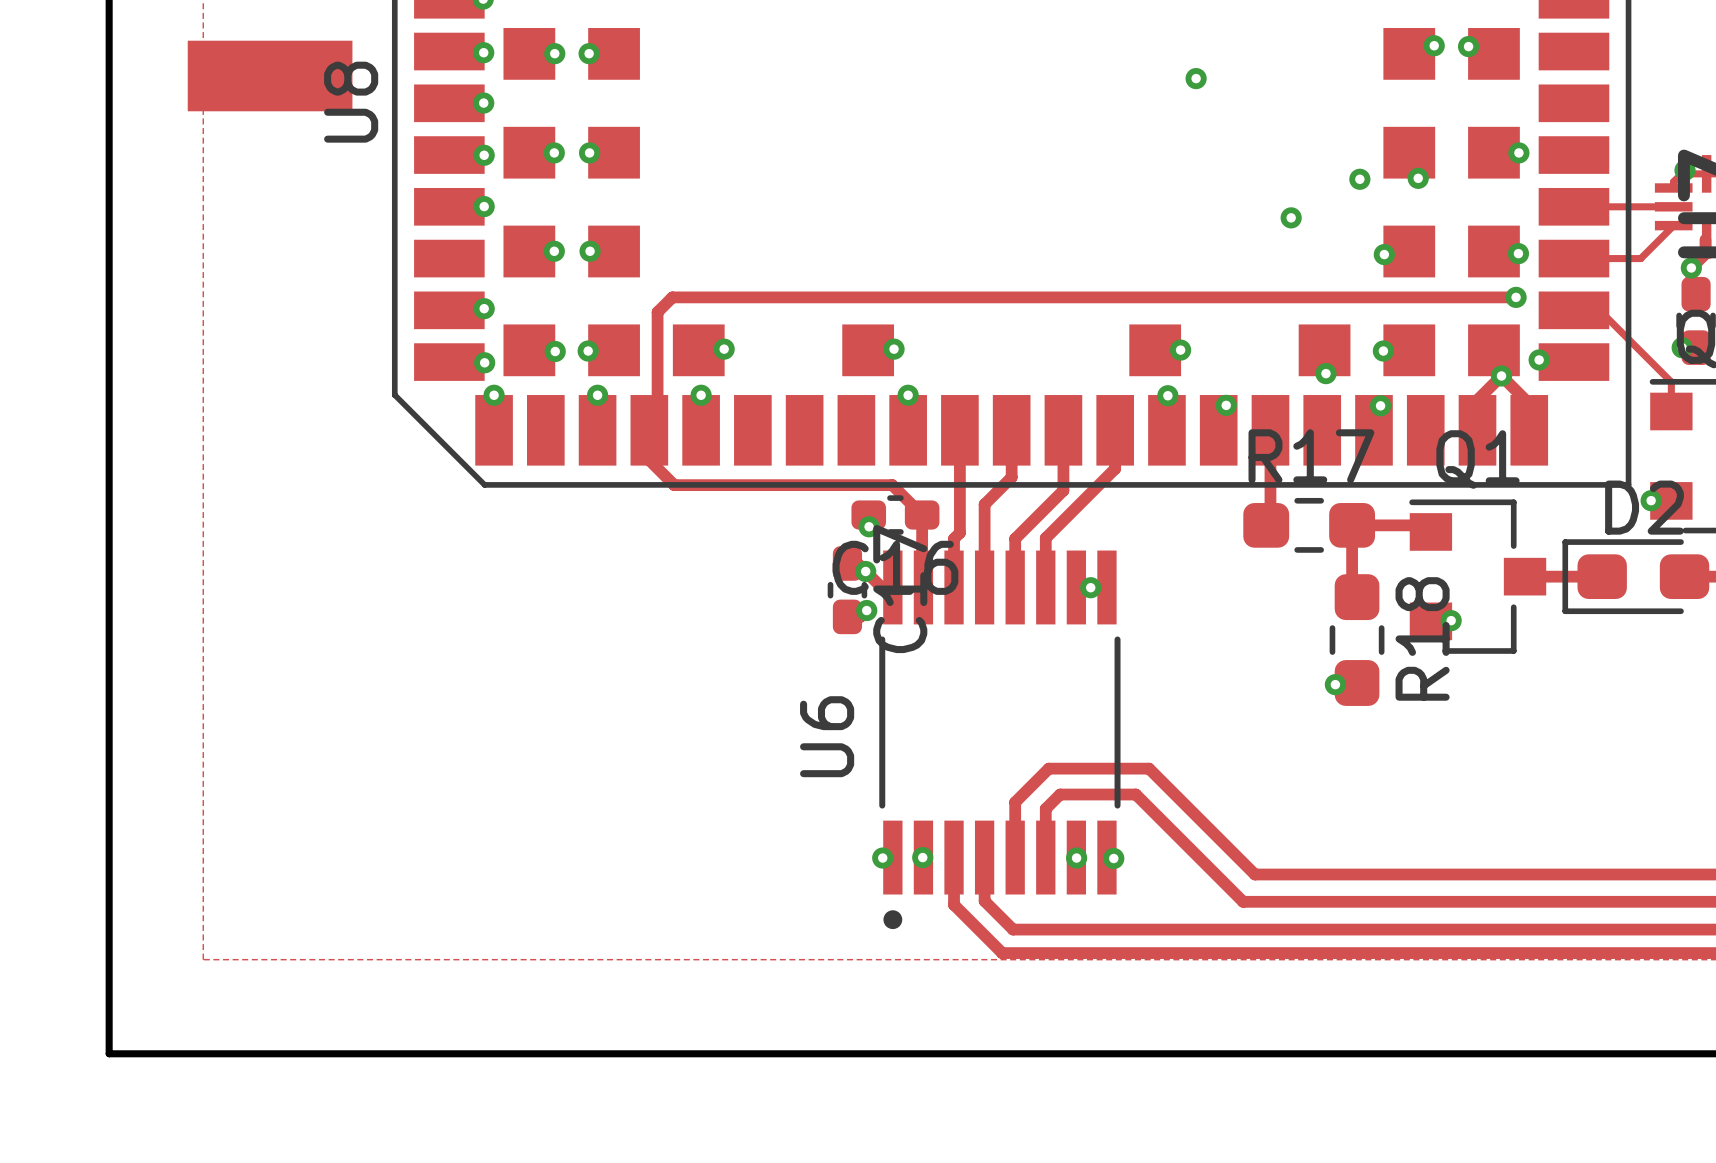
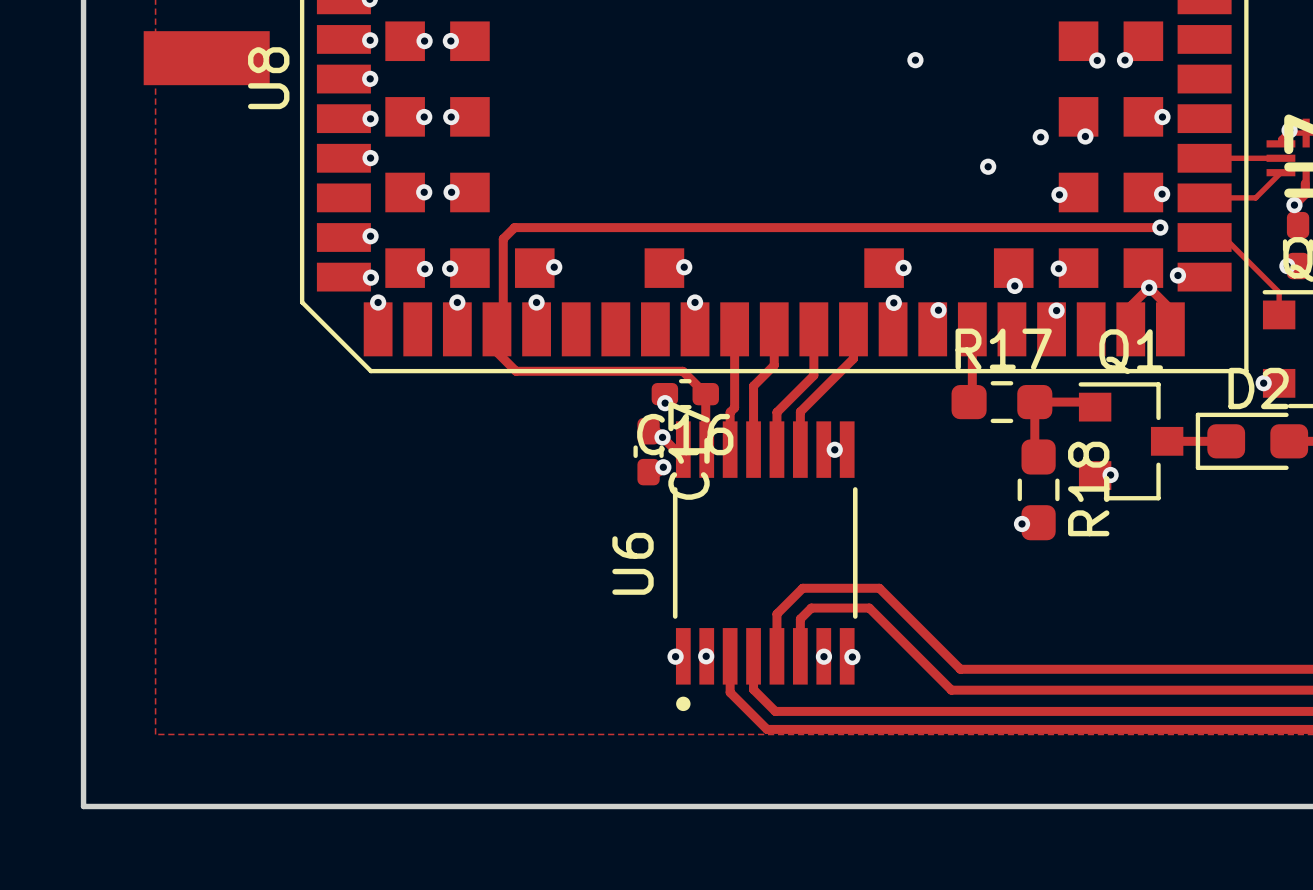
via: (1434, 45) -> none
via: (1468, 46) -> none
via: none -> (1125, 60)
via: none -> (1097, 60)

